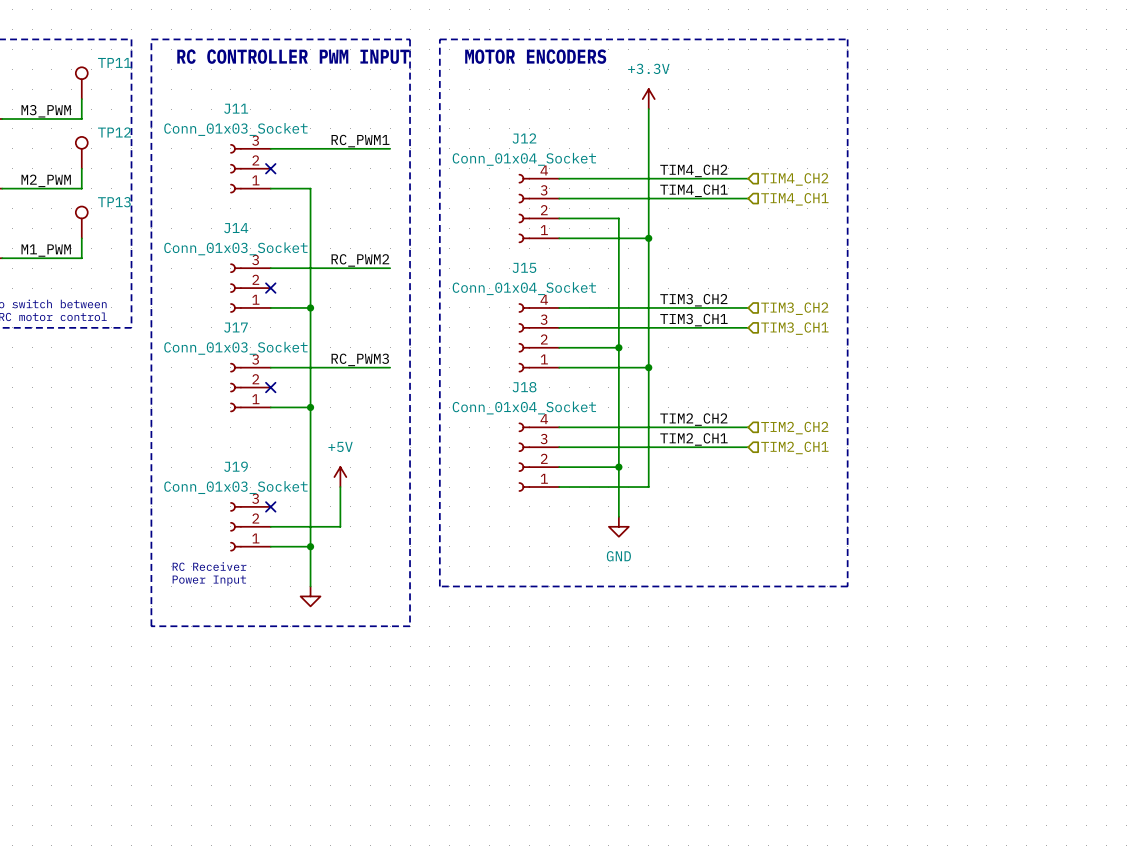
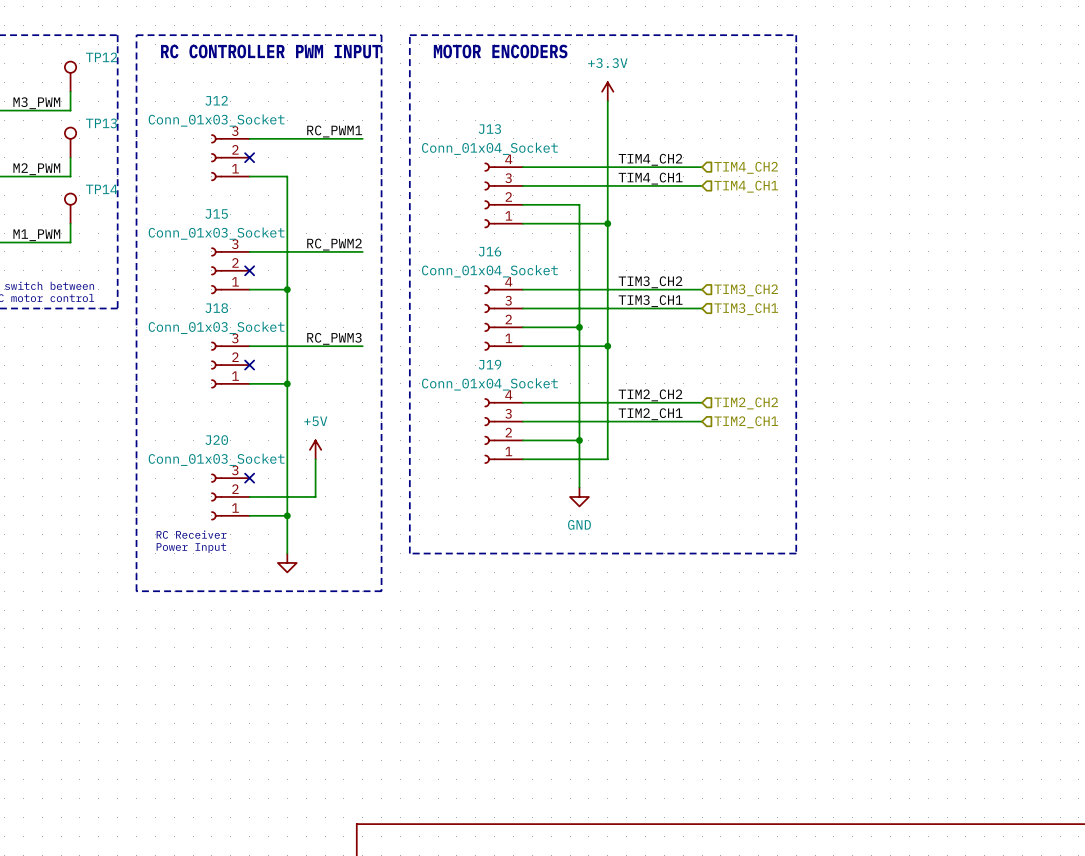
TP11 name: TP11 (114, 62) -> TP12 (101, 57)
J11 name: J11 (236, 108) -> J12 (216, 100)
TP12 name: TP12 (114, 132) -> TP13 (101, 123)
J12 name: J12 (524, 138) -> J13 (489, 129)
TP13 name: TP13 (114, 202) -> TP14 (101, 189)
J14 name: J14 (236, 228) -> J15 (216, 213)
J15 name: J15 (524, 267) -> J16 (490, 251)
J17 name: J17 (235, 327) -> J18 (216, 308)
J18 name: J18 (524, 387) -> J19 (490, 364)
J19 name: J19 (236, 466) -> J20 (216, 440)

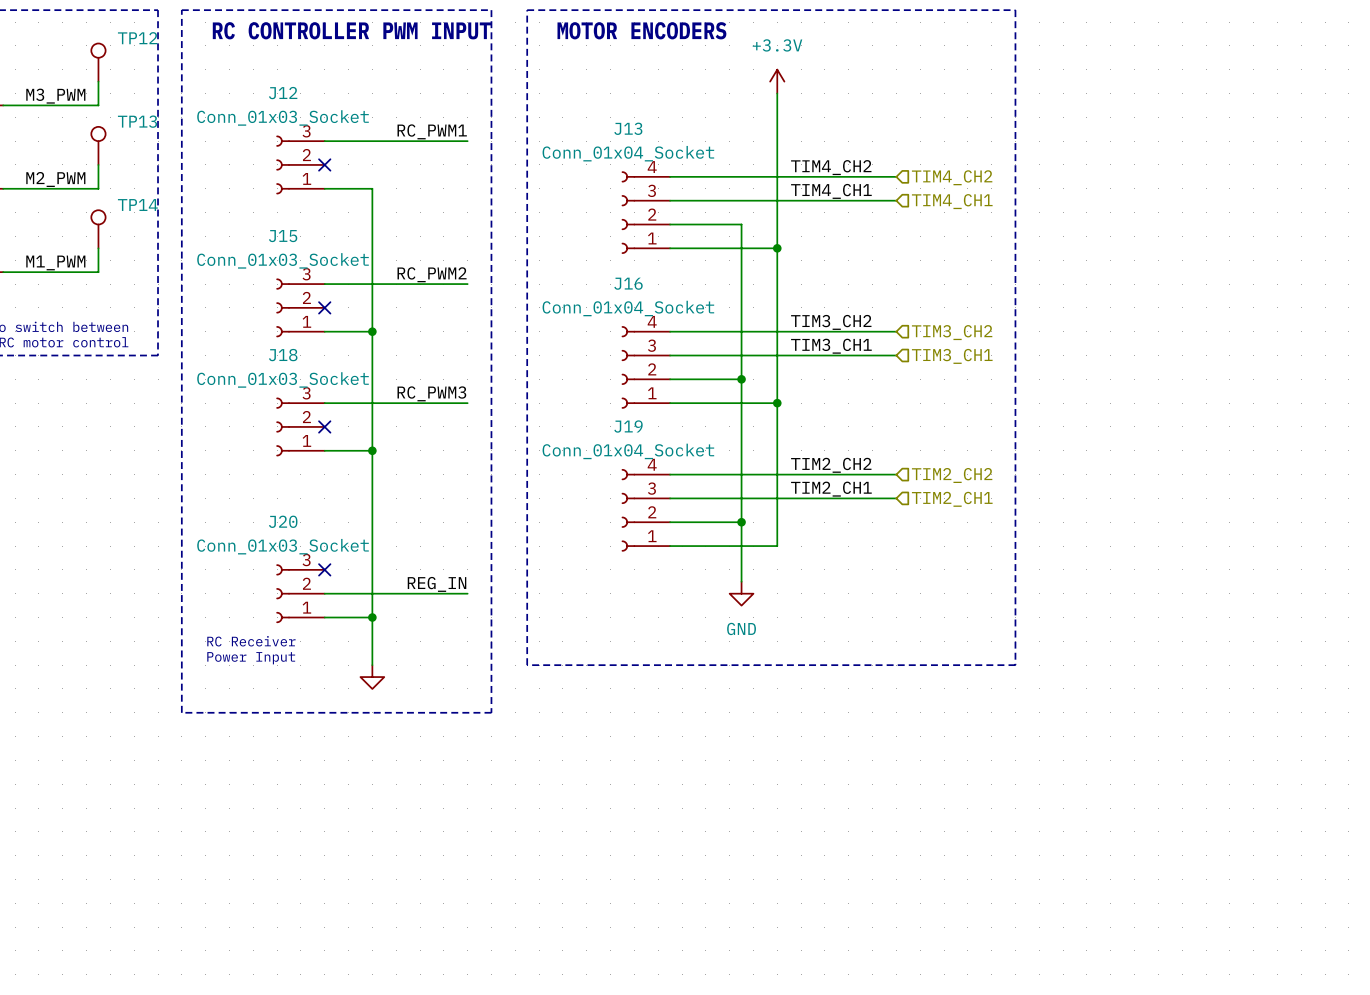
power symbol: +5V (315, 449) -> none
wire: (315, 459) (315, 496) -> (467, 593) (408, 593)
label: none -> REG_IN (437, 584)

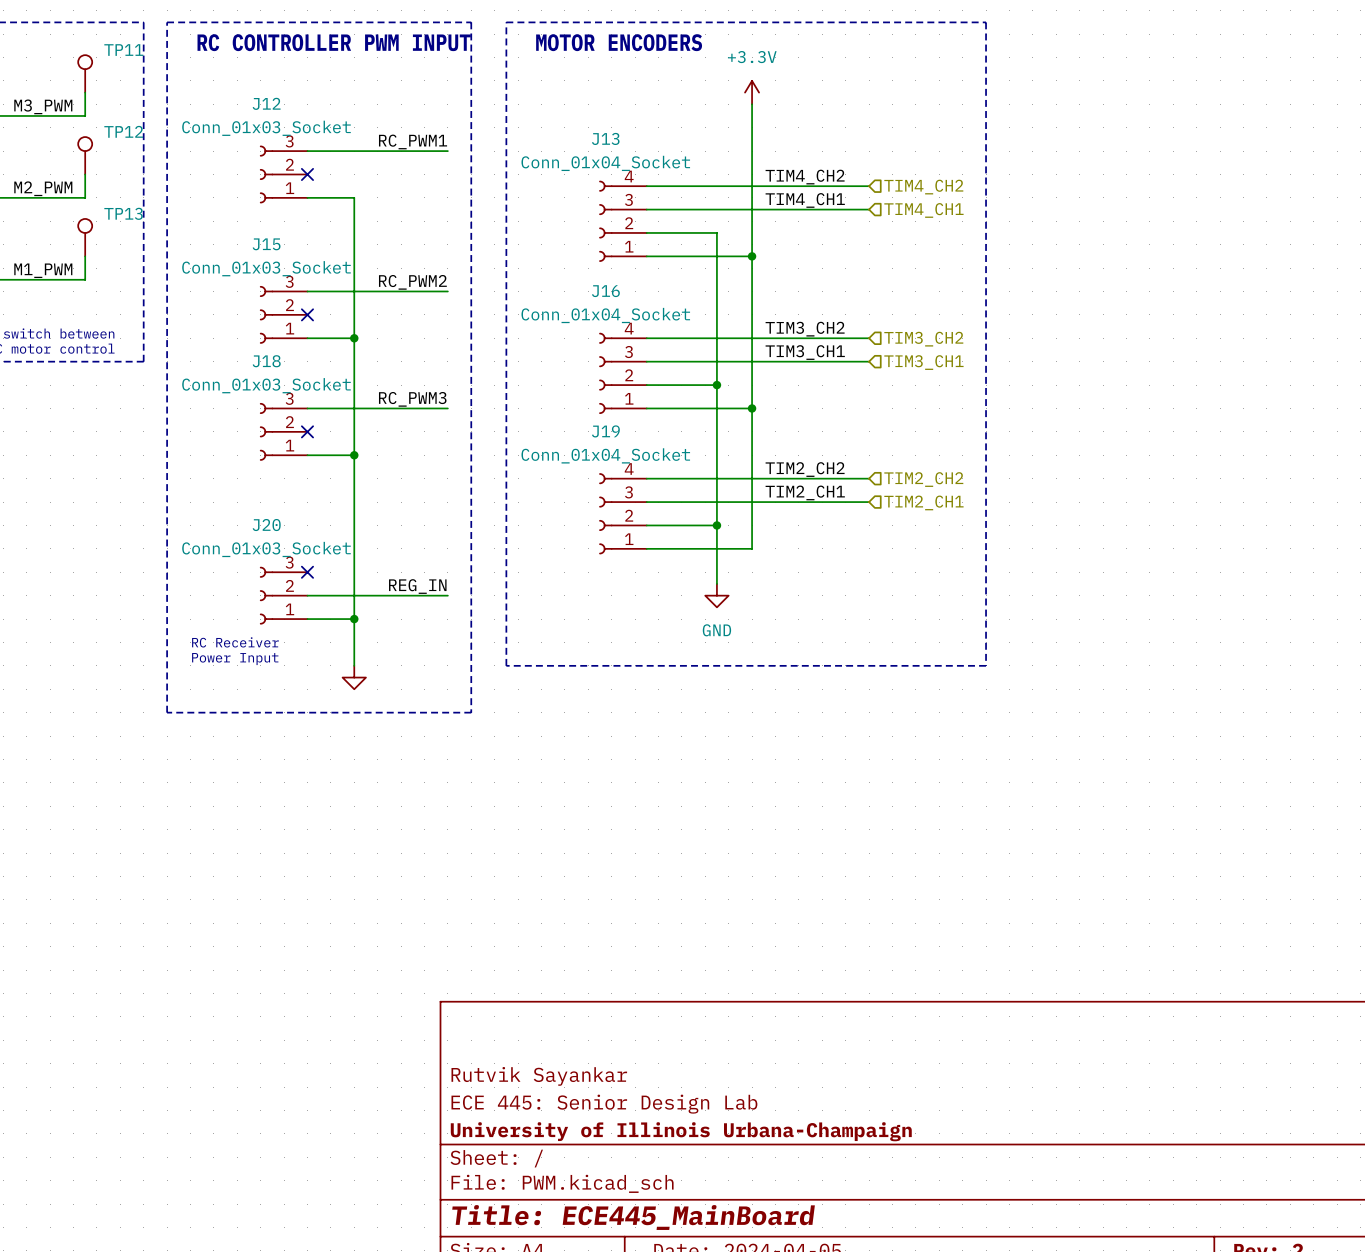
TP12 name: TP12 (137, 38) -> TP11 (123, 50)
TP13 name: TP13 (137, 121) -> TP12 (123, 131)
TP14 name: TP14 (137, 205) -> TP13 (123, 213)

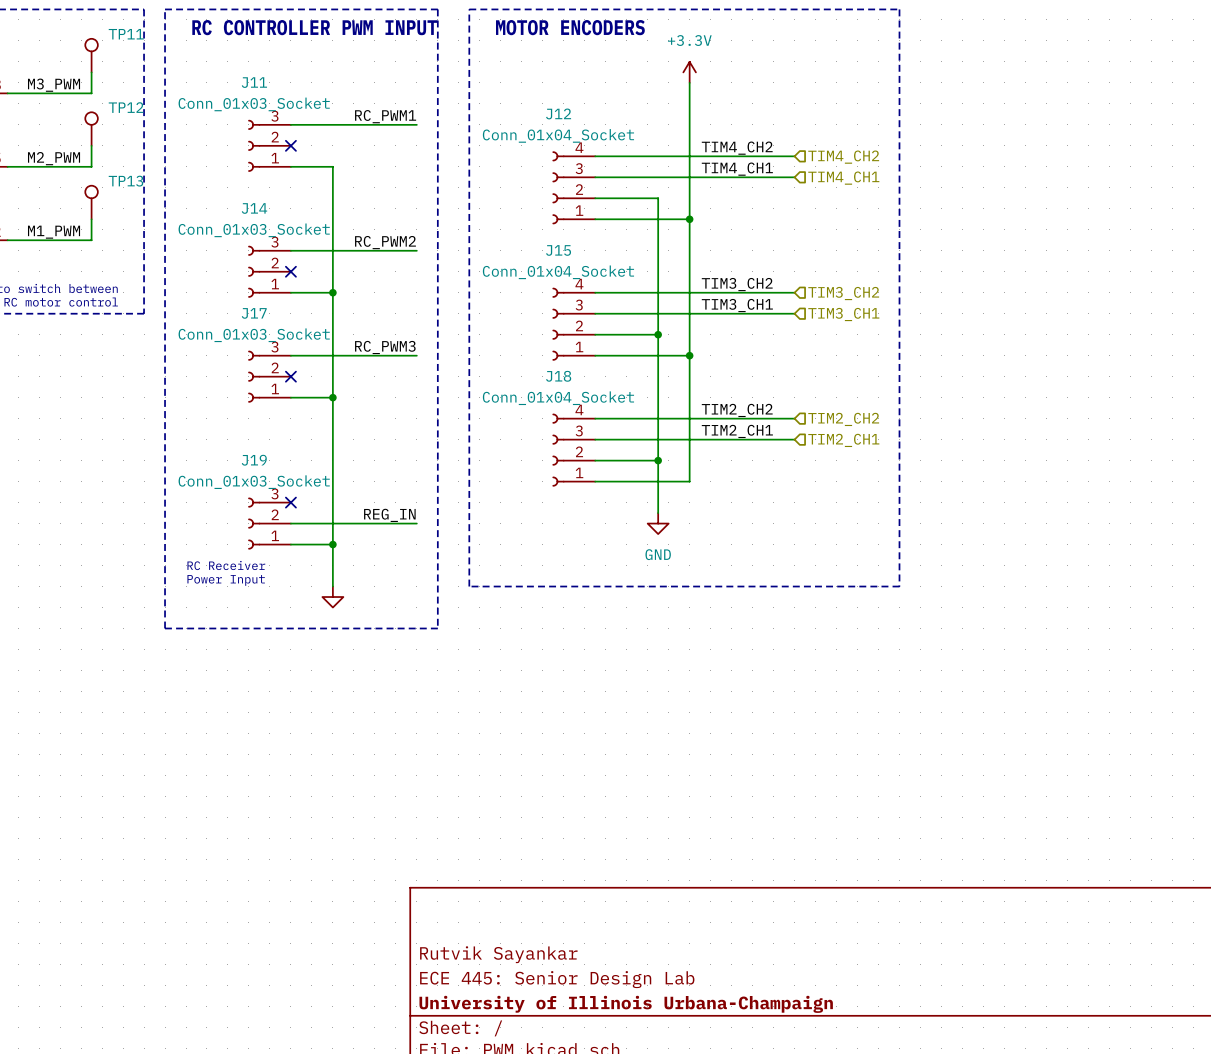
J12 name: J12 (266, 103) -> J11 (254, 82)
J13 name: J13 (605, 138) -> J12 (558, 113)
J15 name: J15 (266, 244) -> J14 (254, 208)
J16 name: J16 (605, 291) -> J15 (558, 250)
J18 name: J18 (266, 361) -> J17 (254, 313)
J19 name: J19 (605, 431) -> J18 (558, 376)
J20 name: J20 (266, 525) -> J19 (254, 460)

